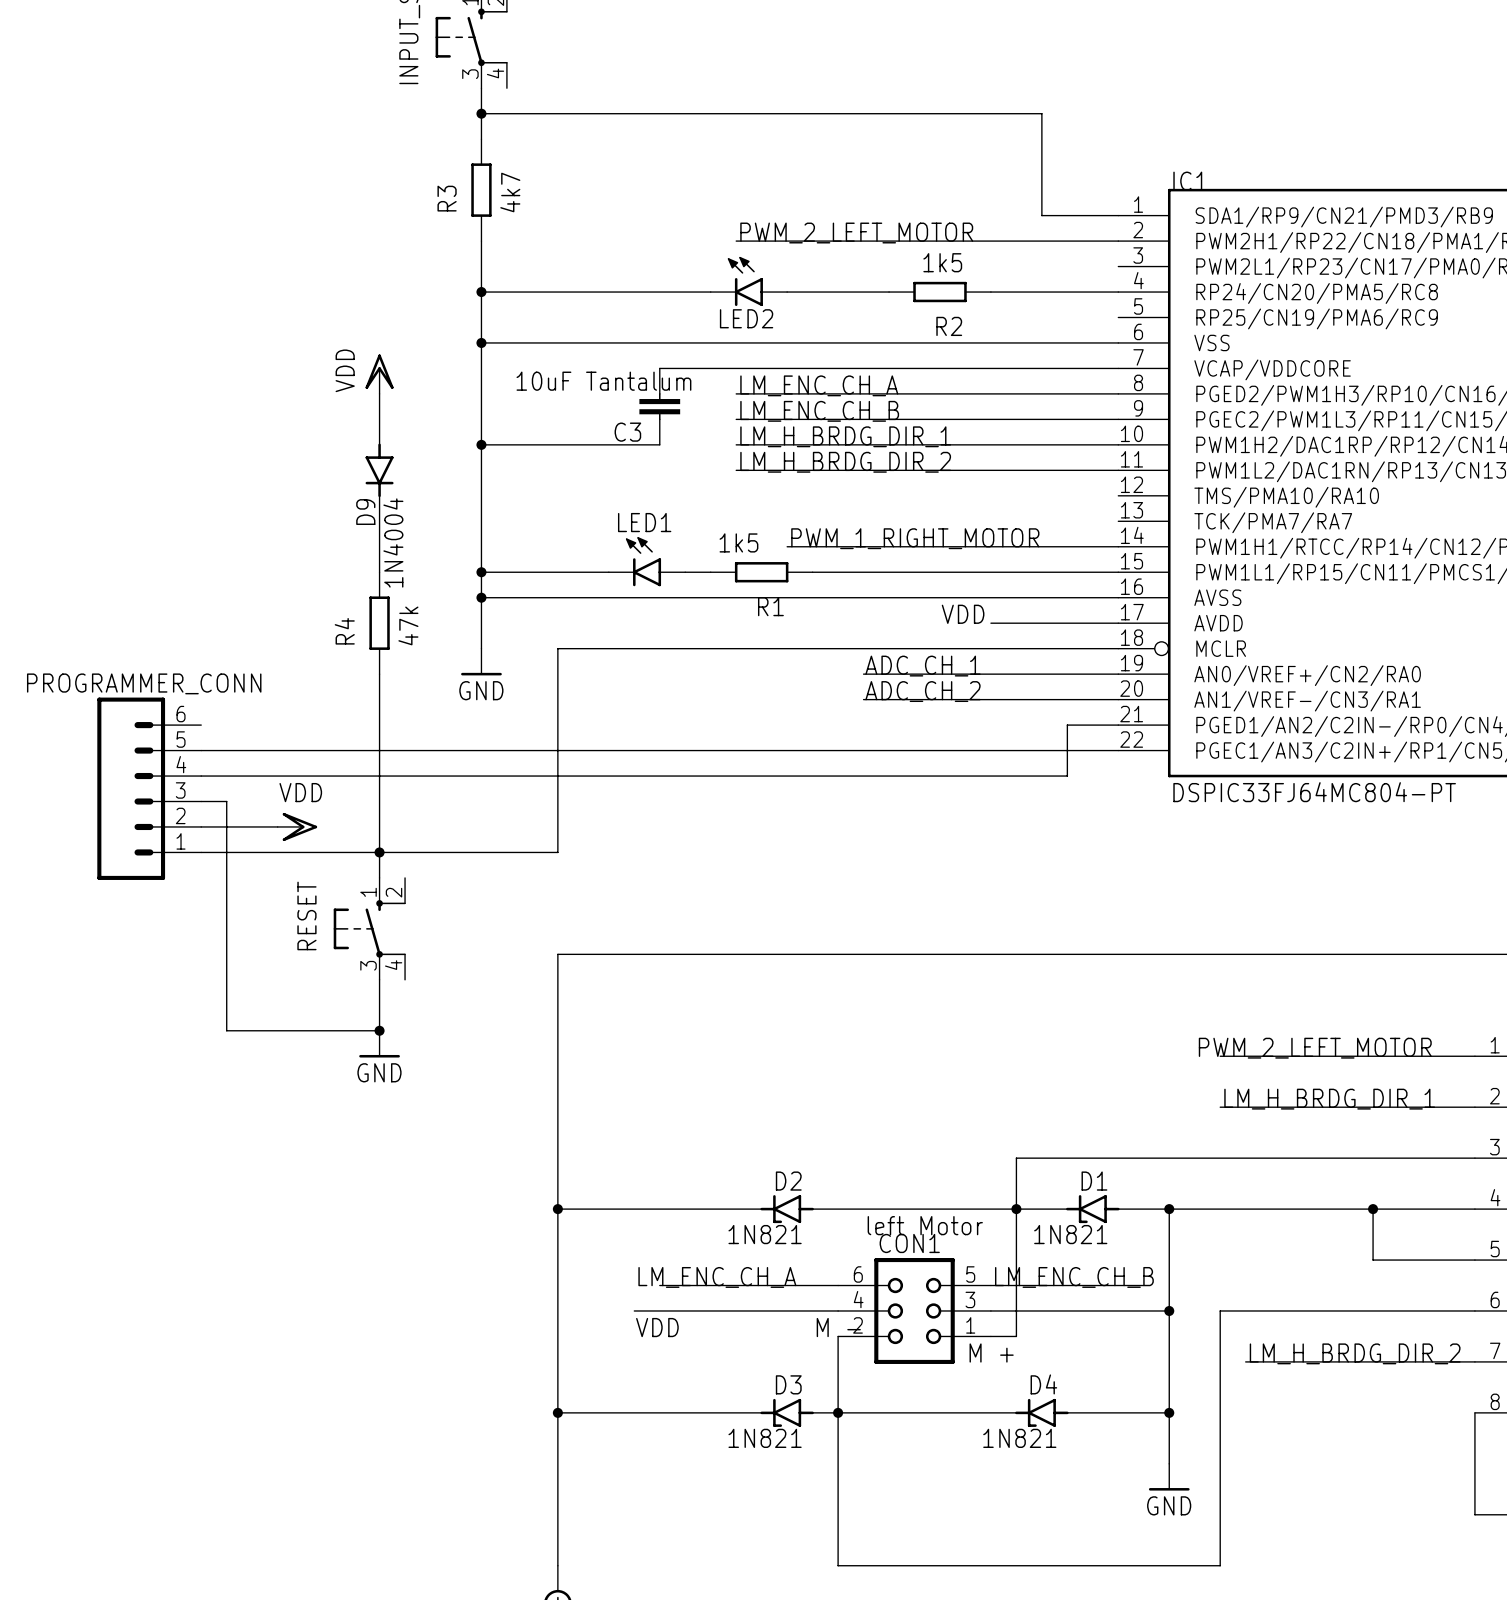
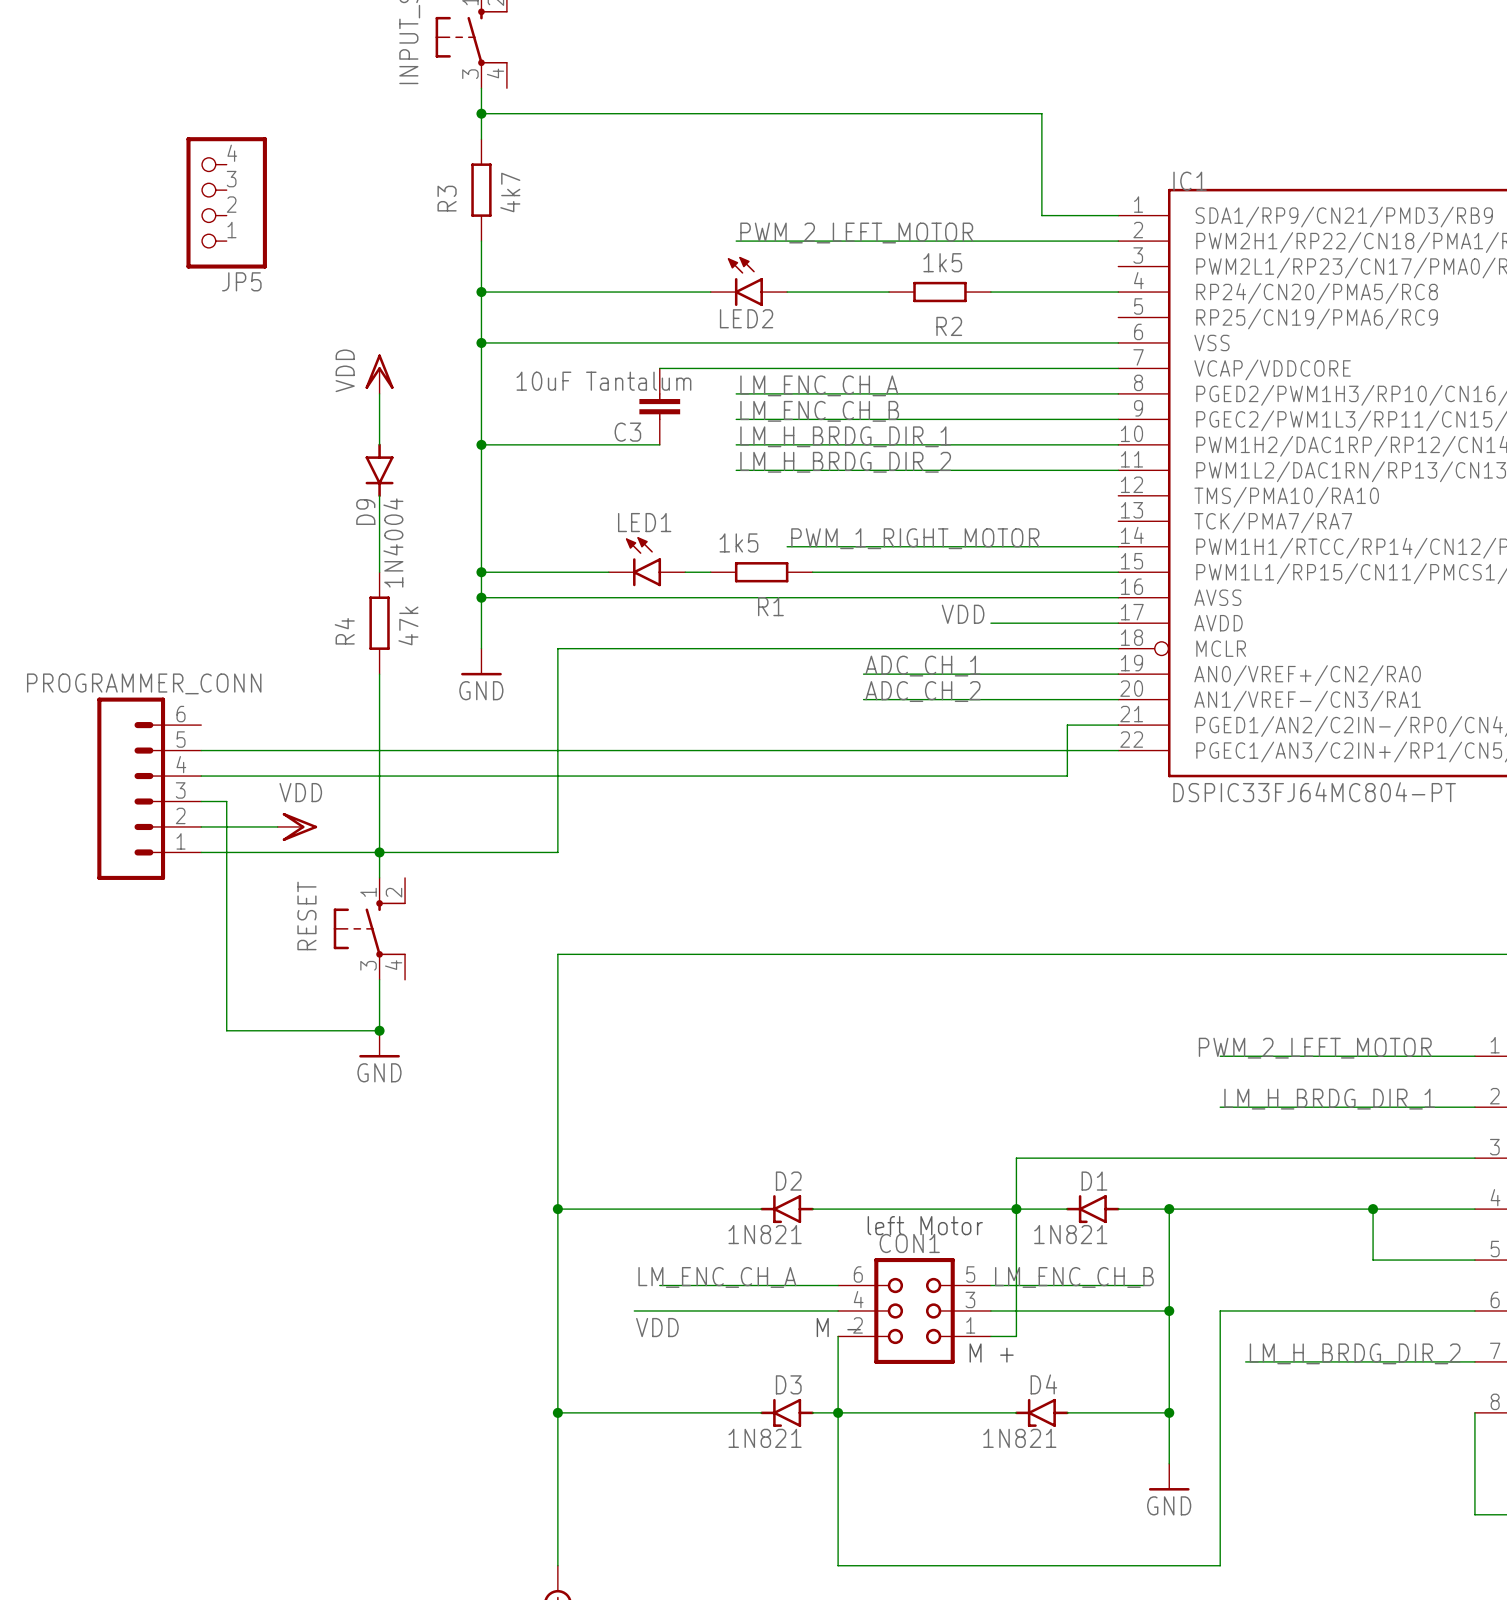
JP5: none -> (226, 202)

